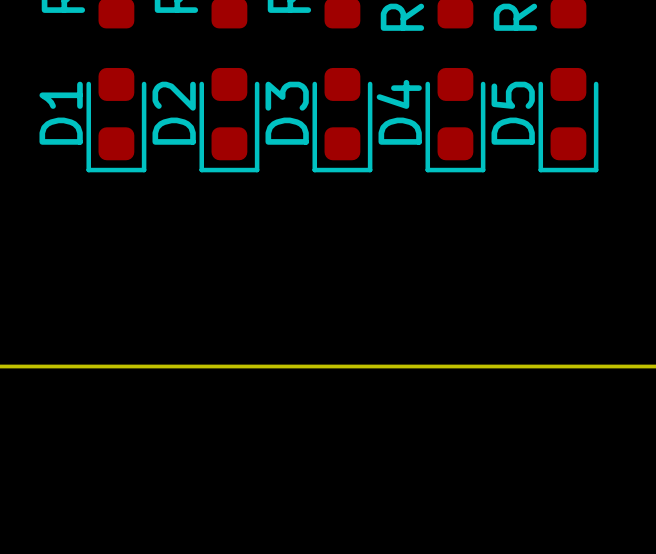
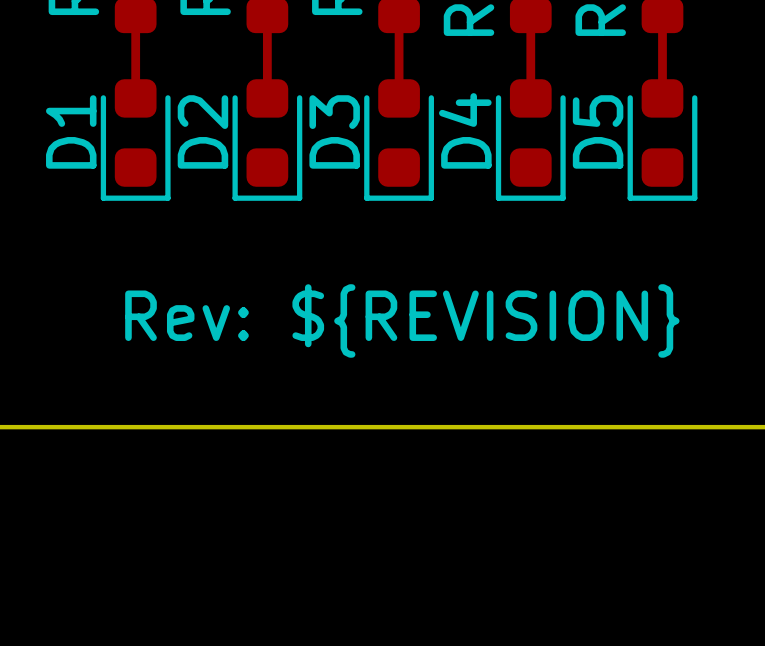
track: none -> (135, 15) (135, 98)
track: none -> (267, 15) (267, 98)
track: none -> (399, 15) (399, 98)
track: none -> (530, 15) (530, 98)
track: none -> (662, 15) (662, 98)
text: none -> Rev: ${REVISION} (402, 320)

